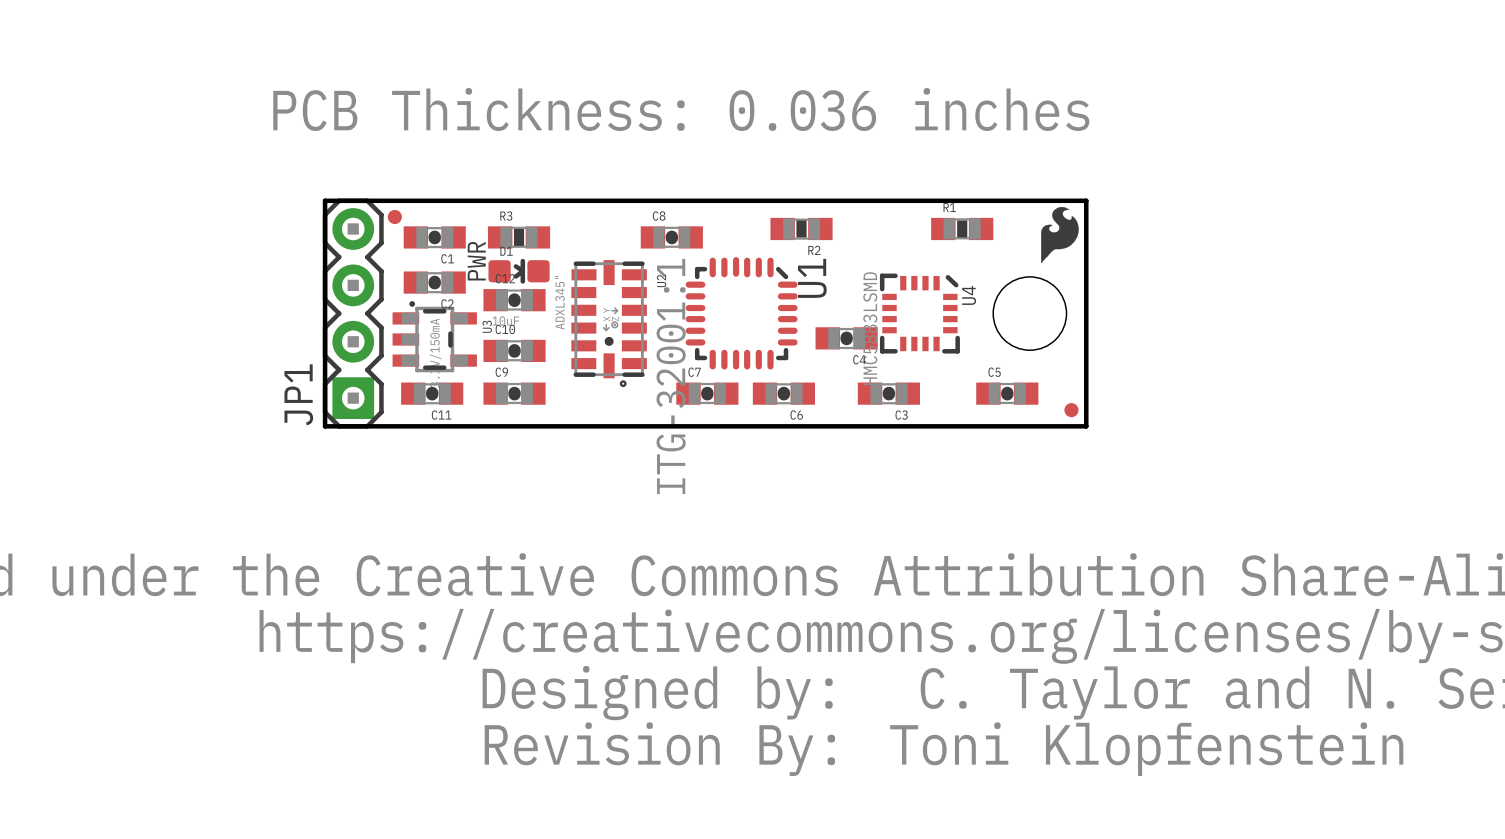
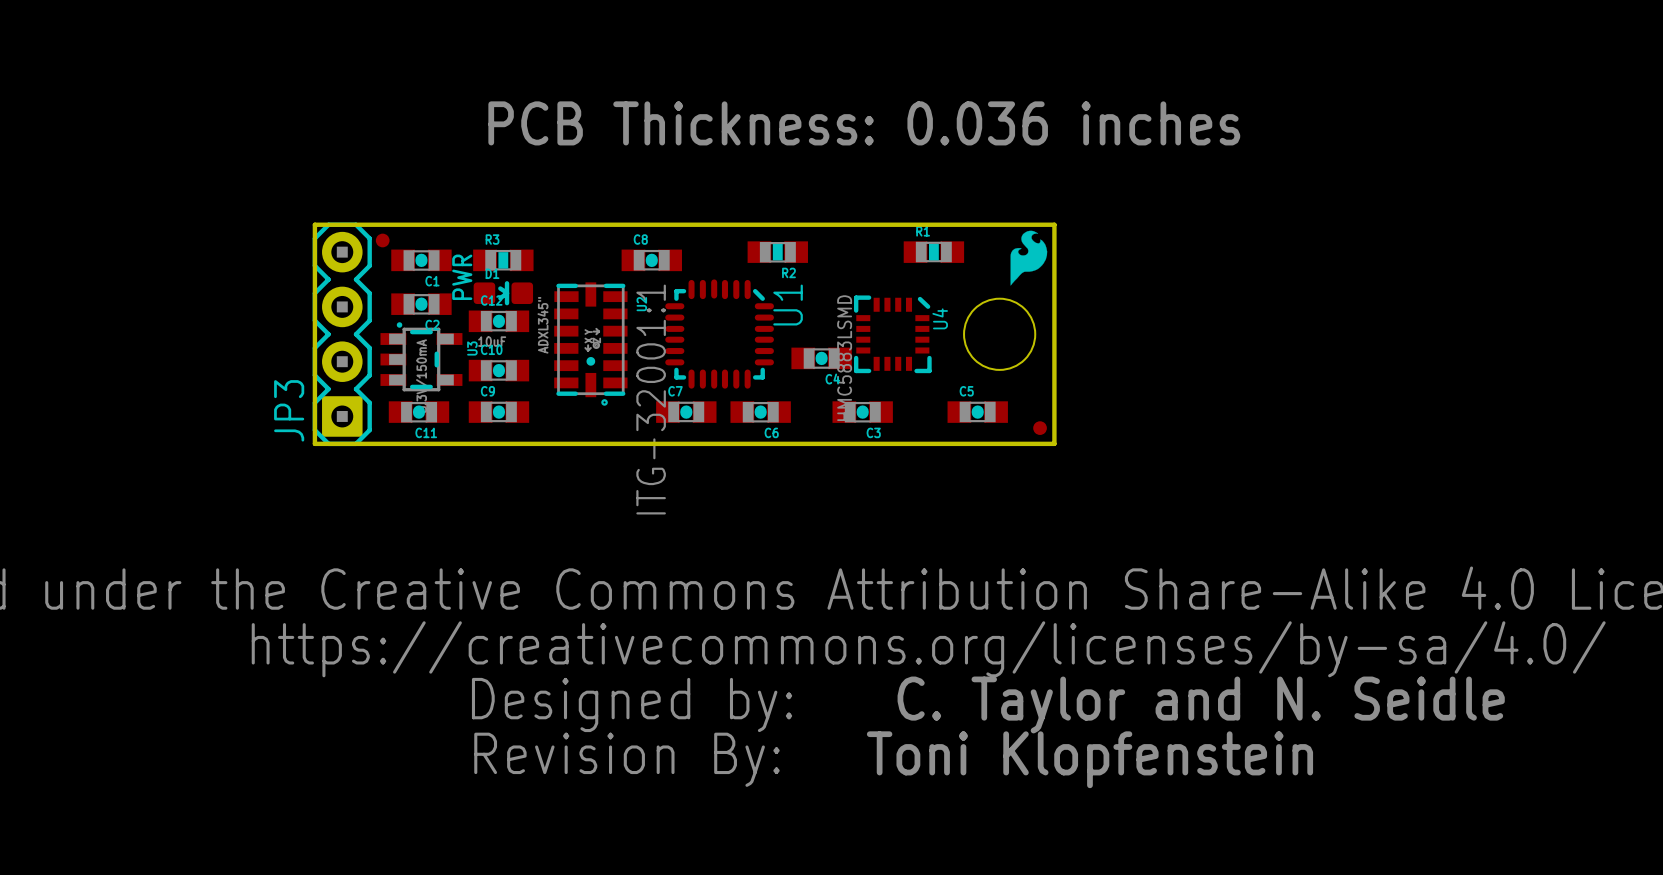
text position: PCB Thickness: 0.036 inches (681, 109) -> PCB Thickness: 0.036 inches (864, 123)
JP1 name: JP1 (298, 394) -> JP3 (289, 410)

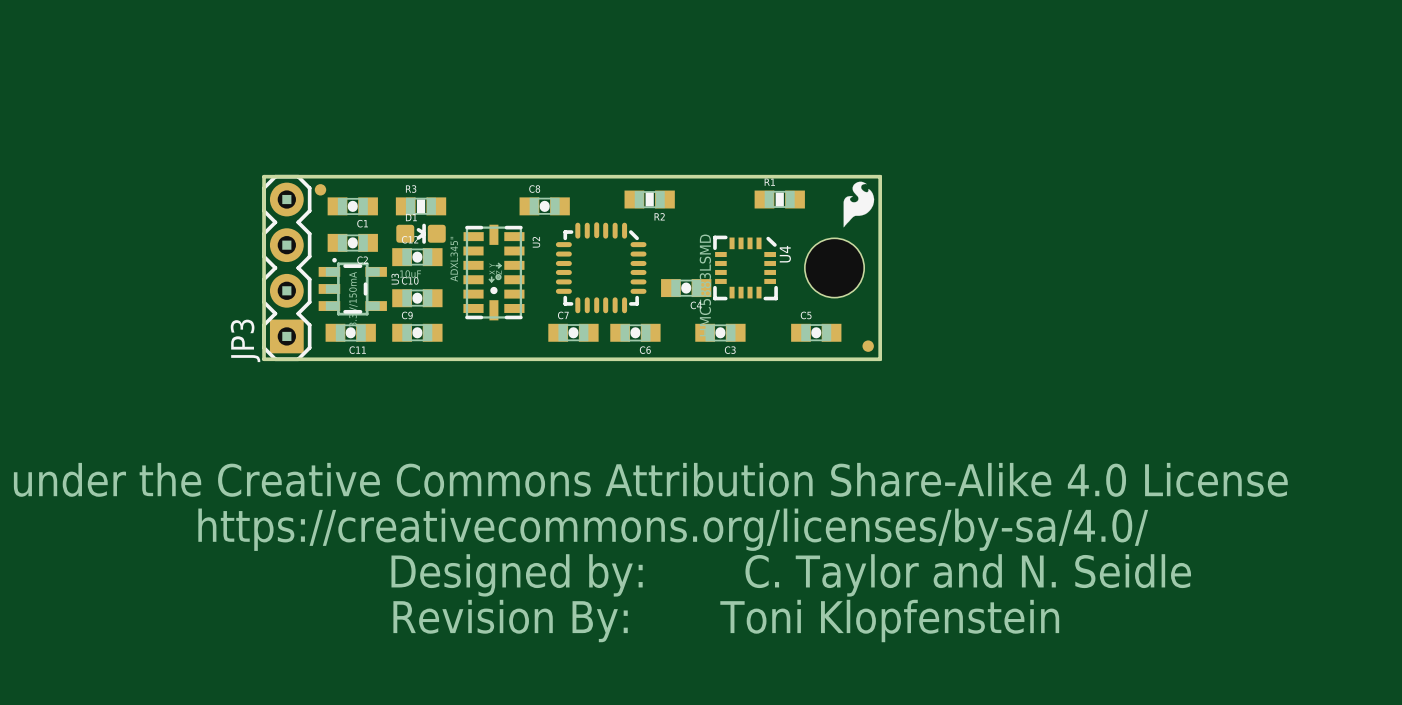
text: PCB Thickness: 0.036 inches (864, 123) -> none
text: PWR (462, 277) -> none
U2 footprint: [554, 282, 628, 406] -> [463, 224, 525, 321]
U1 name: U1 (788, 305) -> none
U1 value: ITG-32001:1 (651, 399) -> none

